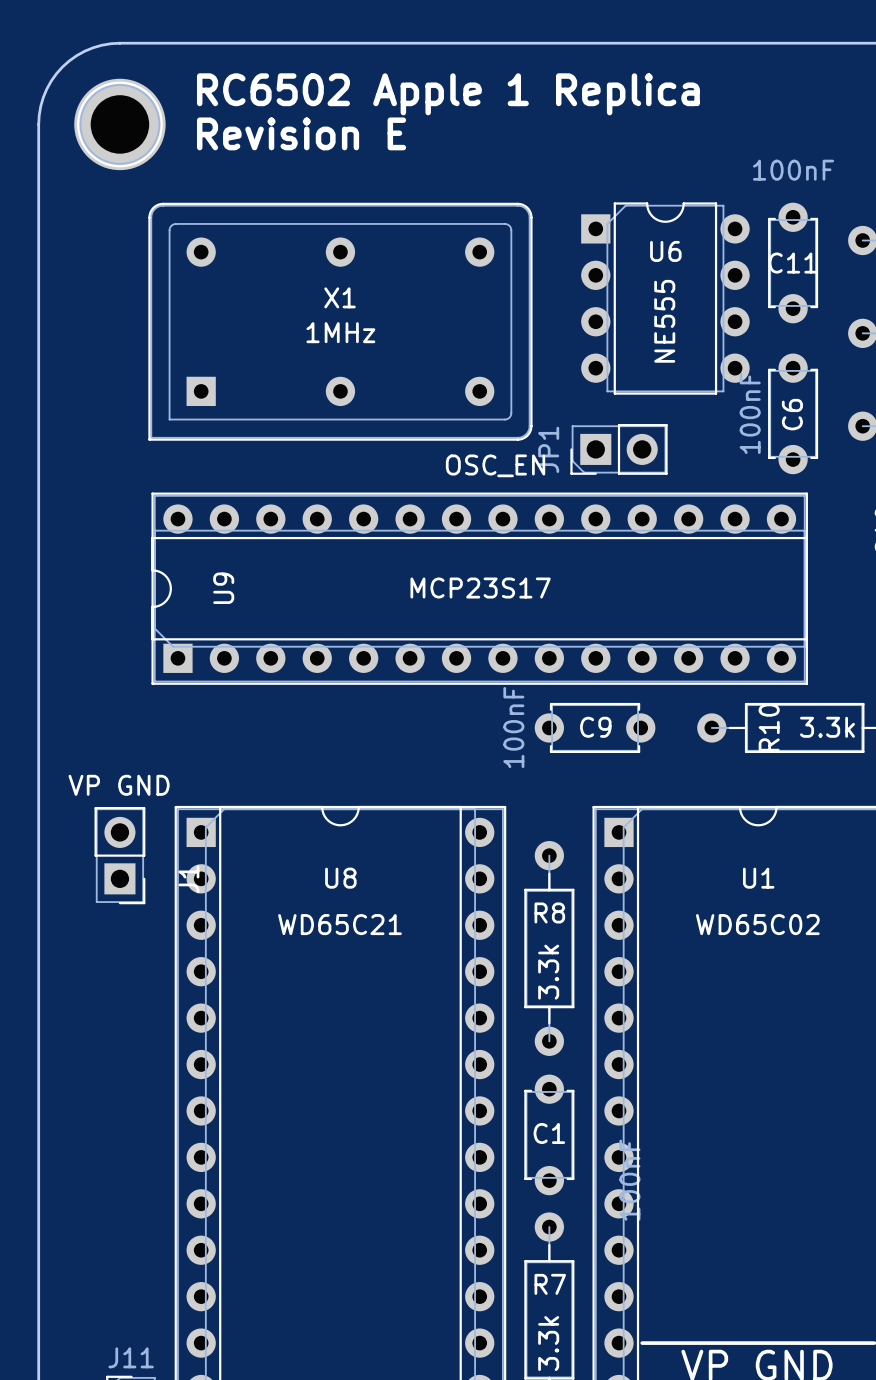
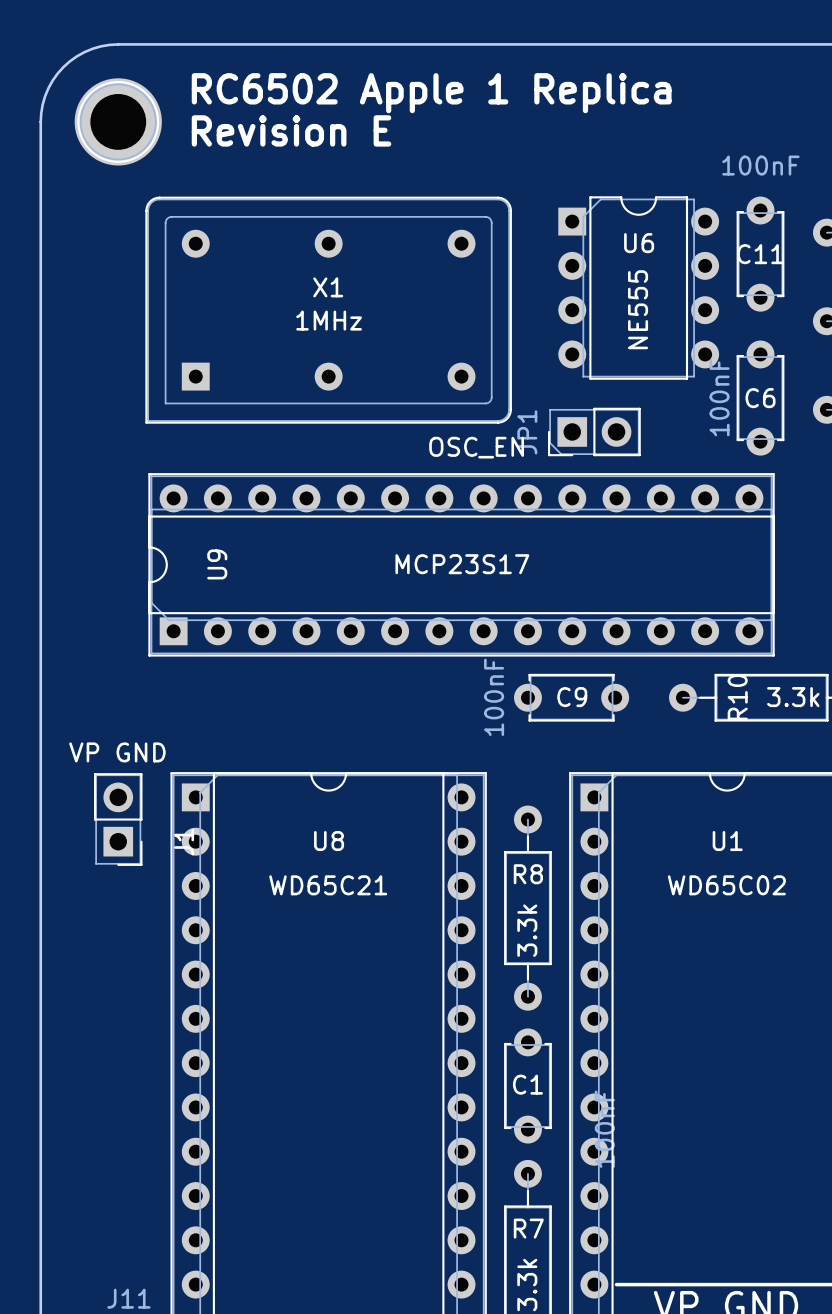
C6 name rotation: 0° (792, 414) -> 90° clockwise (760, 398)

